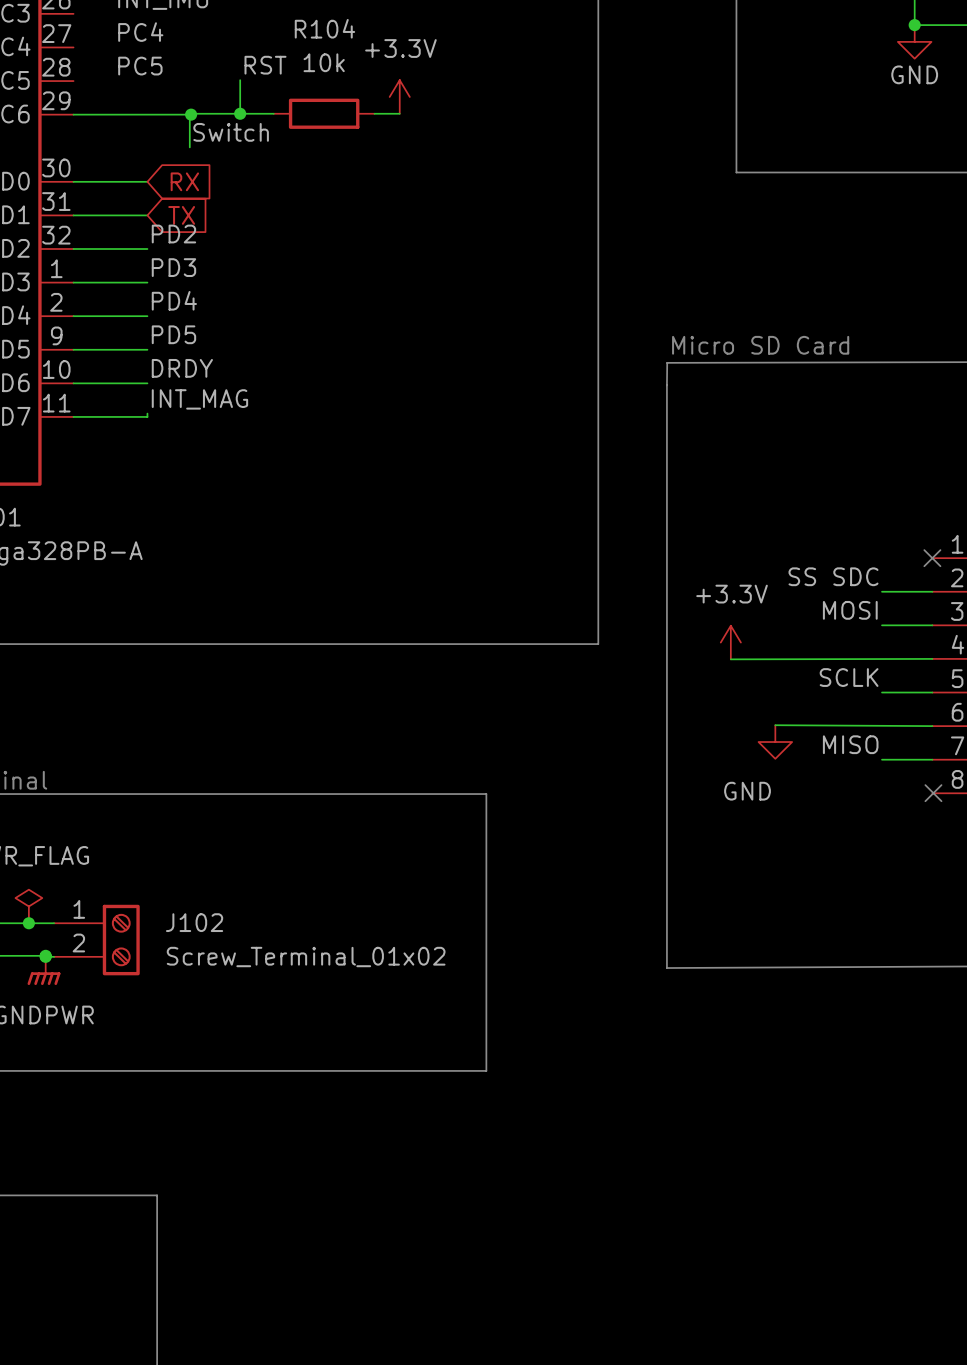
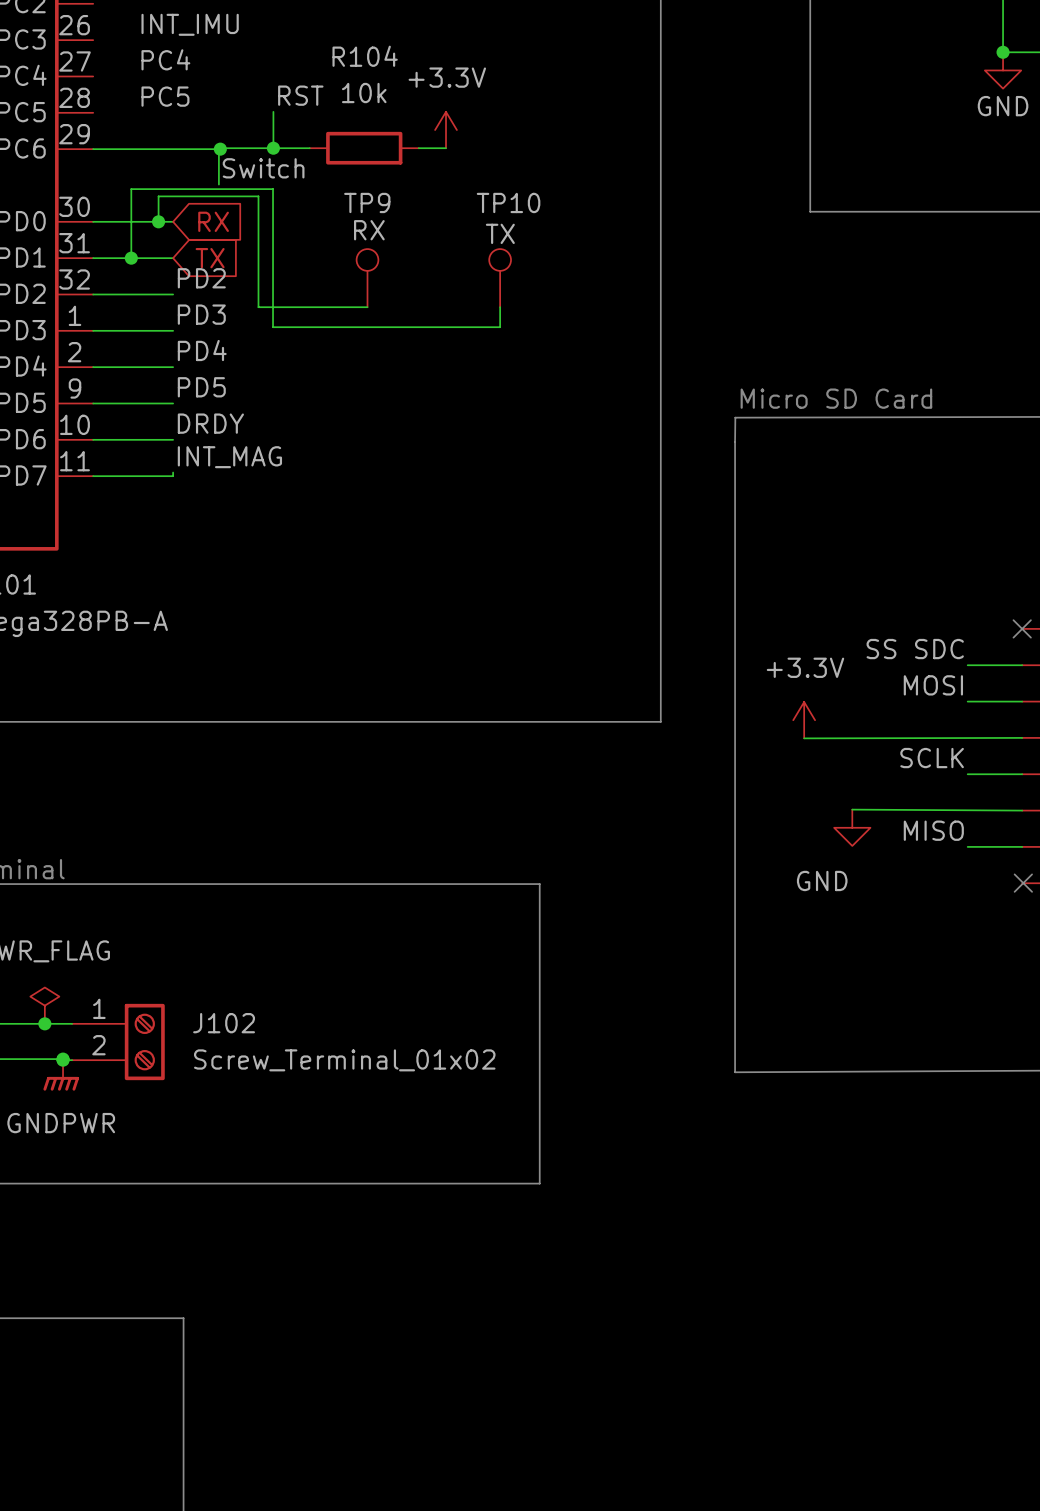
wire: none -> (158, 221) (158, 196) (258, 196) (258, 307) (367, 307)
junction: none -> (158, 221)
wire: none -> (131, 258) (131, 189) (273, 189) (273, 327) (500, 327) (500, 307)
junction: none -> (131, 258)
TP9: none -> RX (367, 278)
TP10: none -> TX (500, 278)

